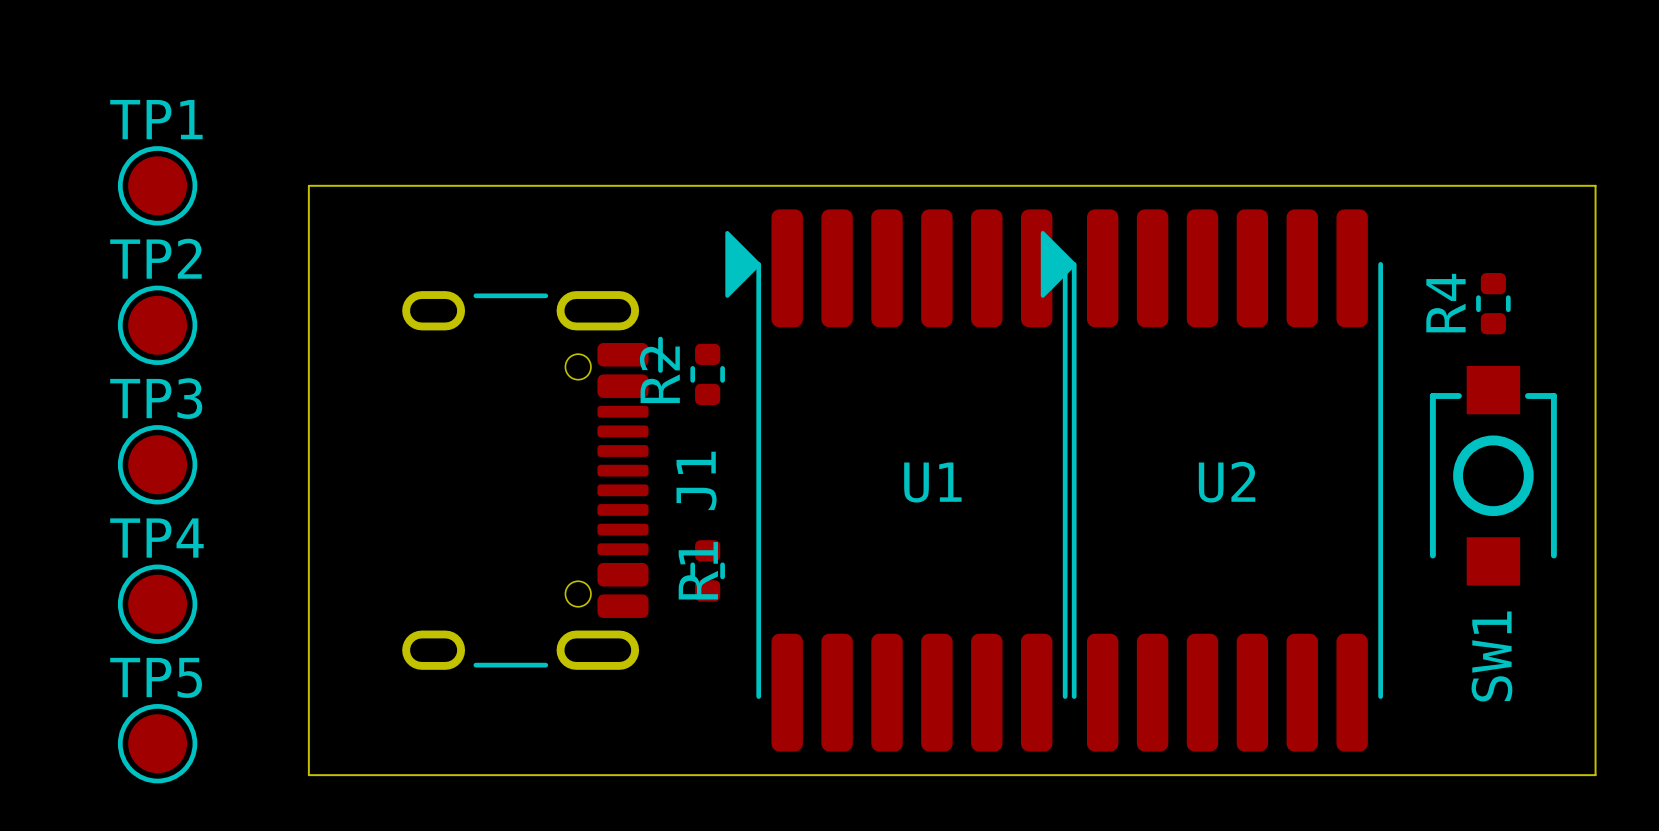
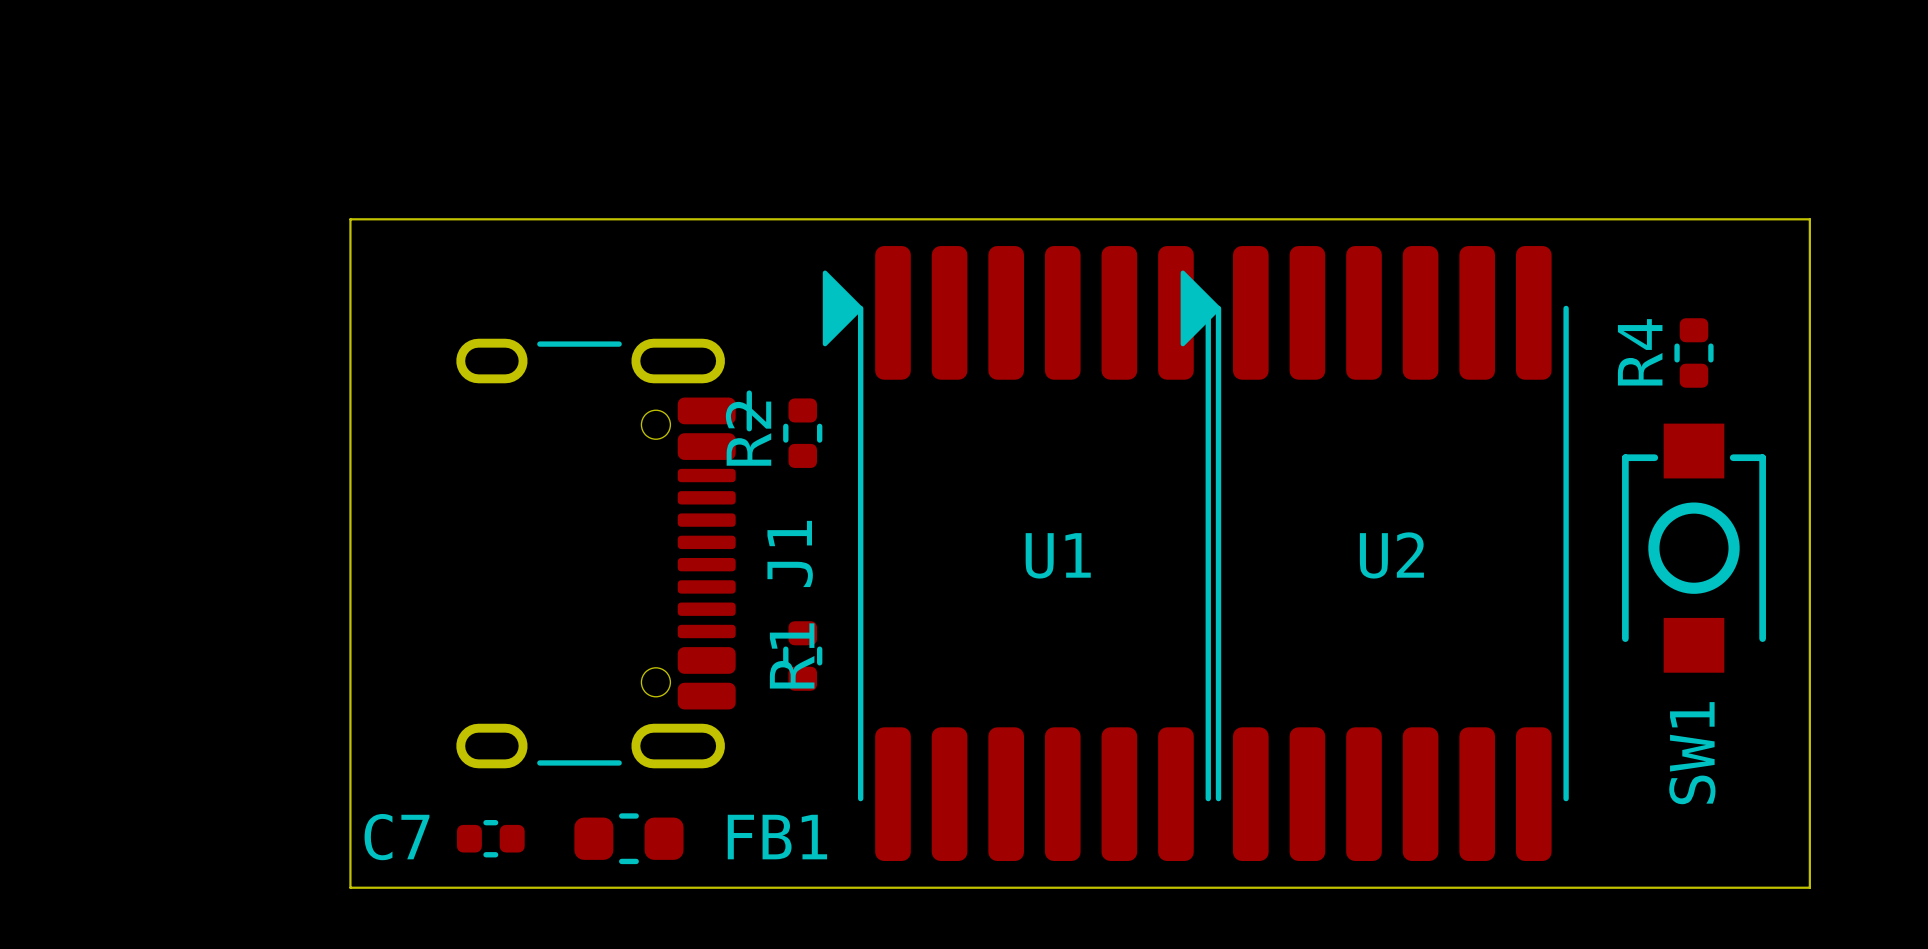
TP1: (157, 185) -> none
TP2: (157, 325) -> none
TP3: (157, 464) -> none
TP4: (157, 604) -> none
C7: none -> (490, 838)
FB1: none -> (628, 838)
TP5: (157, 743) -> none

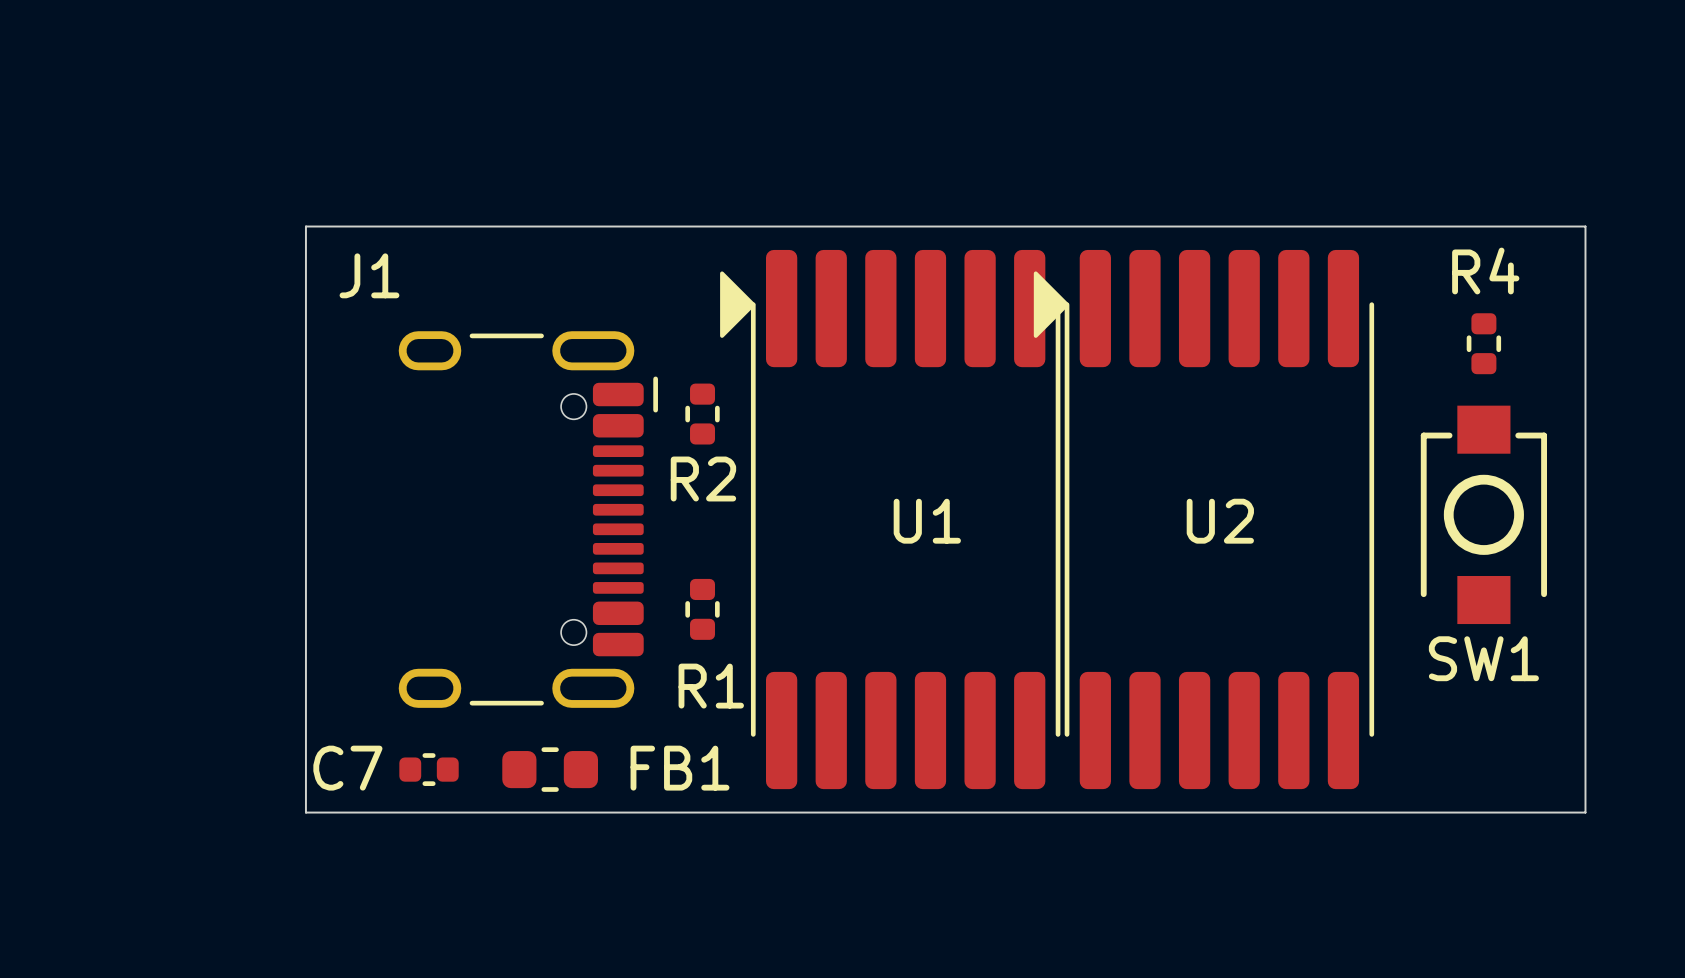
R4 name rotation: 0° (1640, 352) -> 90° clockwise (1485, 271)
R2 name rotation: 0° (748, 433) -> 90° clockwise (703, 479)
J1 name rotation: 0° (790, 553) -> 90° clockwise (369, 275)
J1 name position: J1 (790, 553) -> J1 (369, 275)
R1 name rotation: 0° (792, 655) -> 90° clockwise (711, 686)
SW1 name rotation: 0° (1692, 753) -> 90° clockwise (1483, 658)

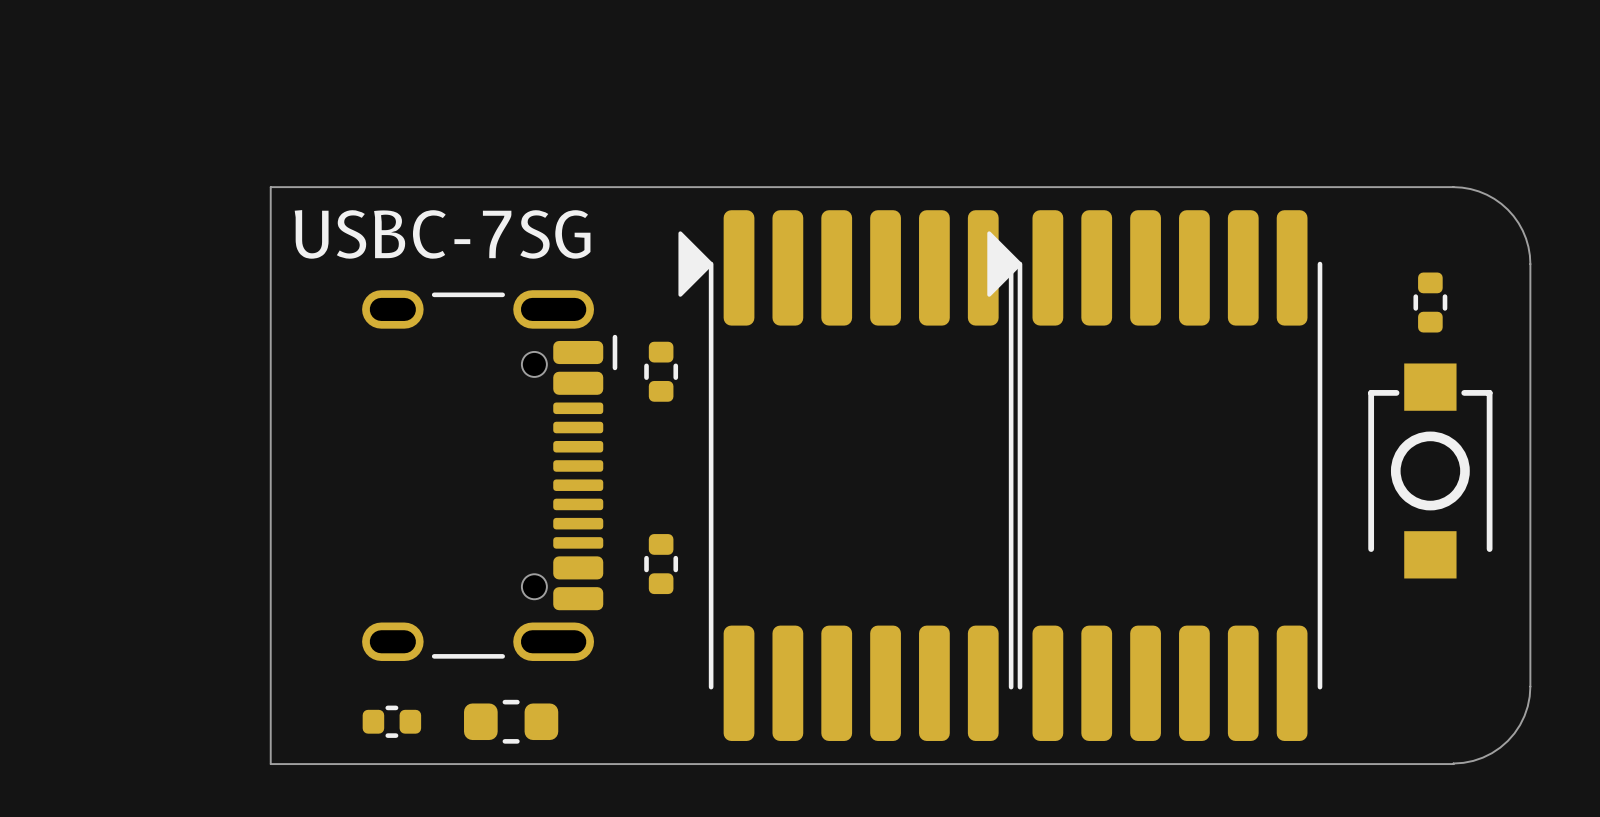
board edge: (1507, 226) (1585, 226) (1585, 304) -> (1453, 187) (1478, 191) (1494, 198) (1507, 209) (1518, 223) (1526, 238) (1530, 264)
R4 name: R4 (1485, 271) -> none
text: none -> USBC-7SG (442, 234)
J1 name: J1 (369, 275) -> none
R2 name: R2 (703, 479) -> none
U1 name: U1 (927, 521) -> none
U2 name: U2 (1220, 521) -> none
SW1 name: SW1 (1483, 658) -> none
R1 name: R1 (711, 686) -> none
board edge: (1585, 733) (1585, 812) (1507, 812) -> (1530, 686) (1524, 716) (1507, 740) (1482, 757) (1453, 763)
C7 name: C7 (347, 768) -> none
FB1 name: FB1 (680, 768) -> none

